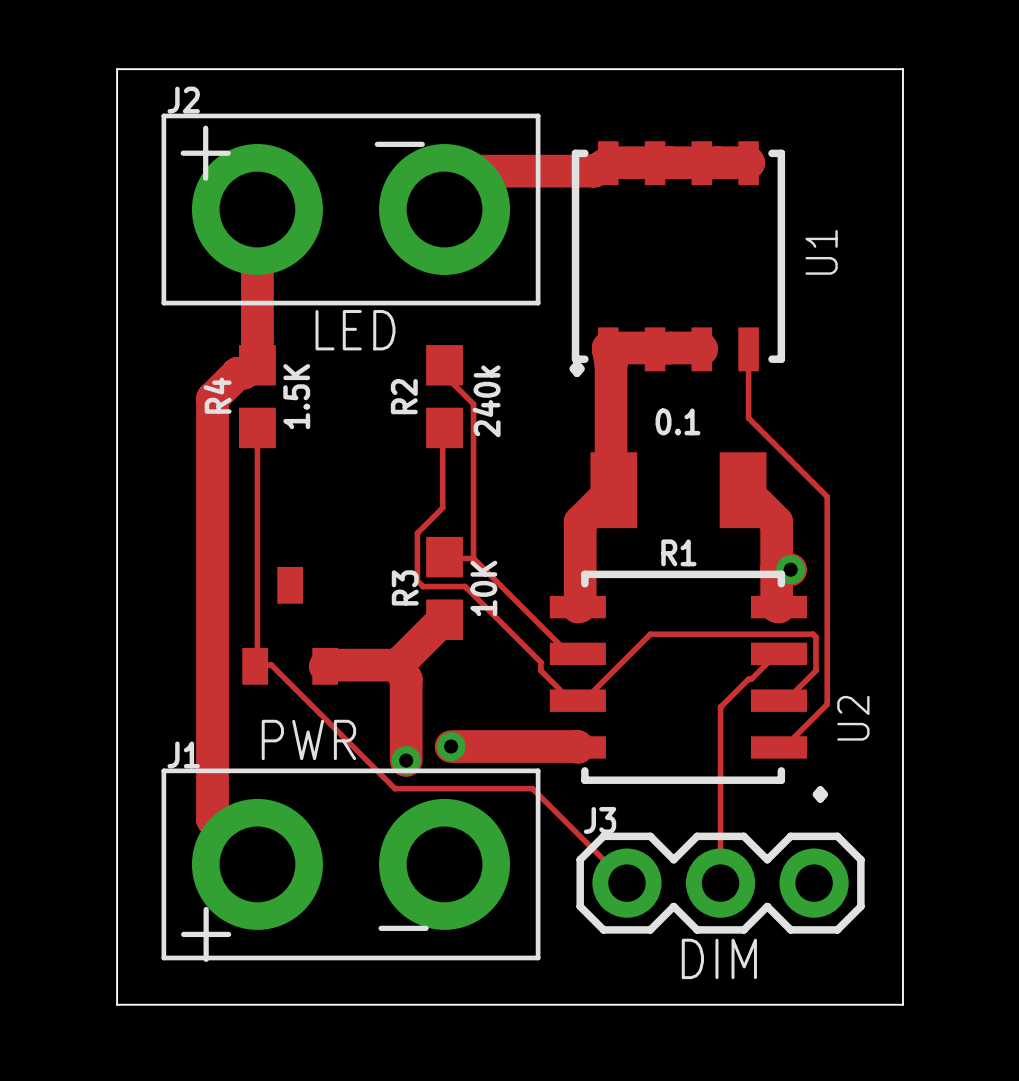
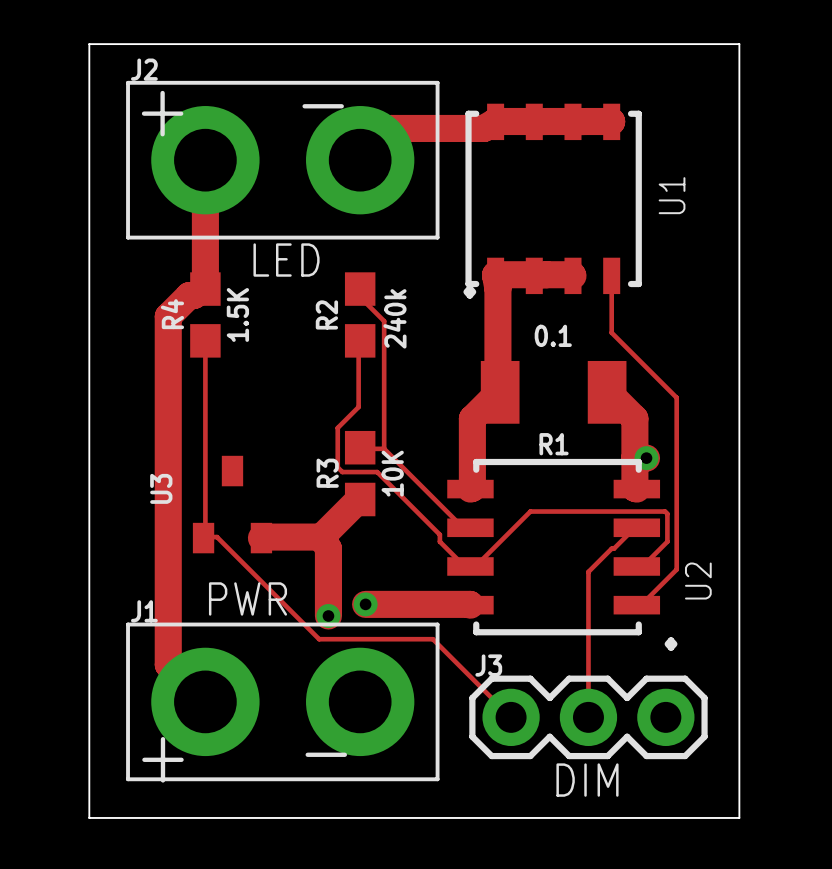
text: none -> U3 (161, 488)

